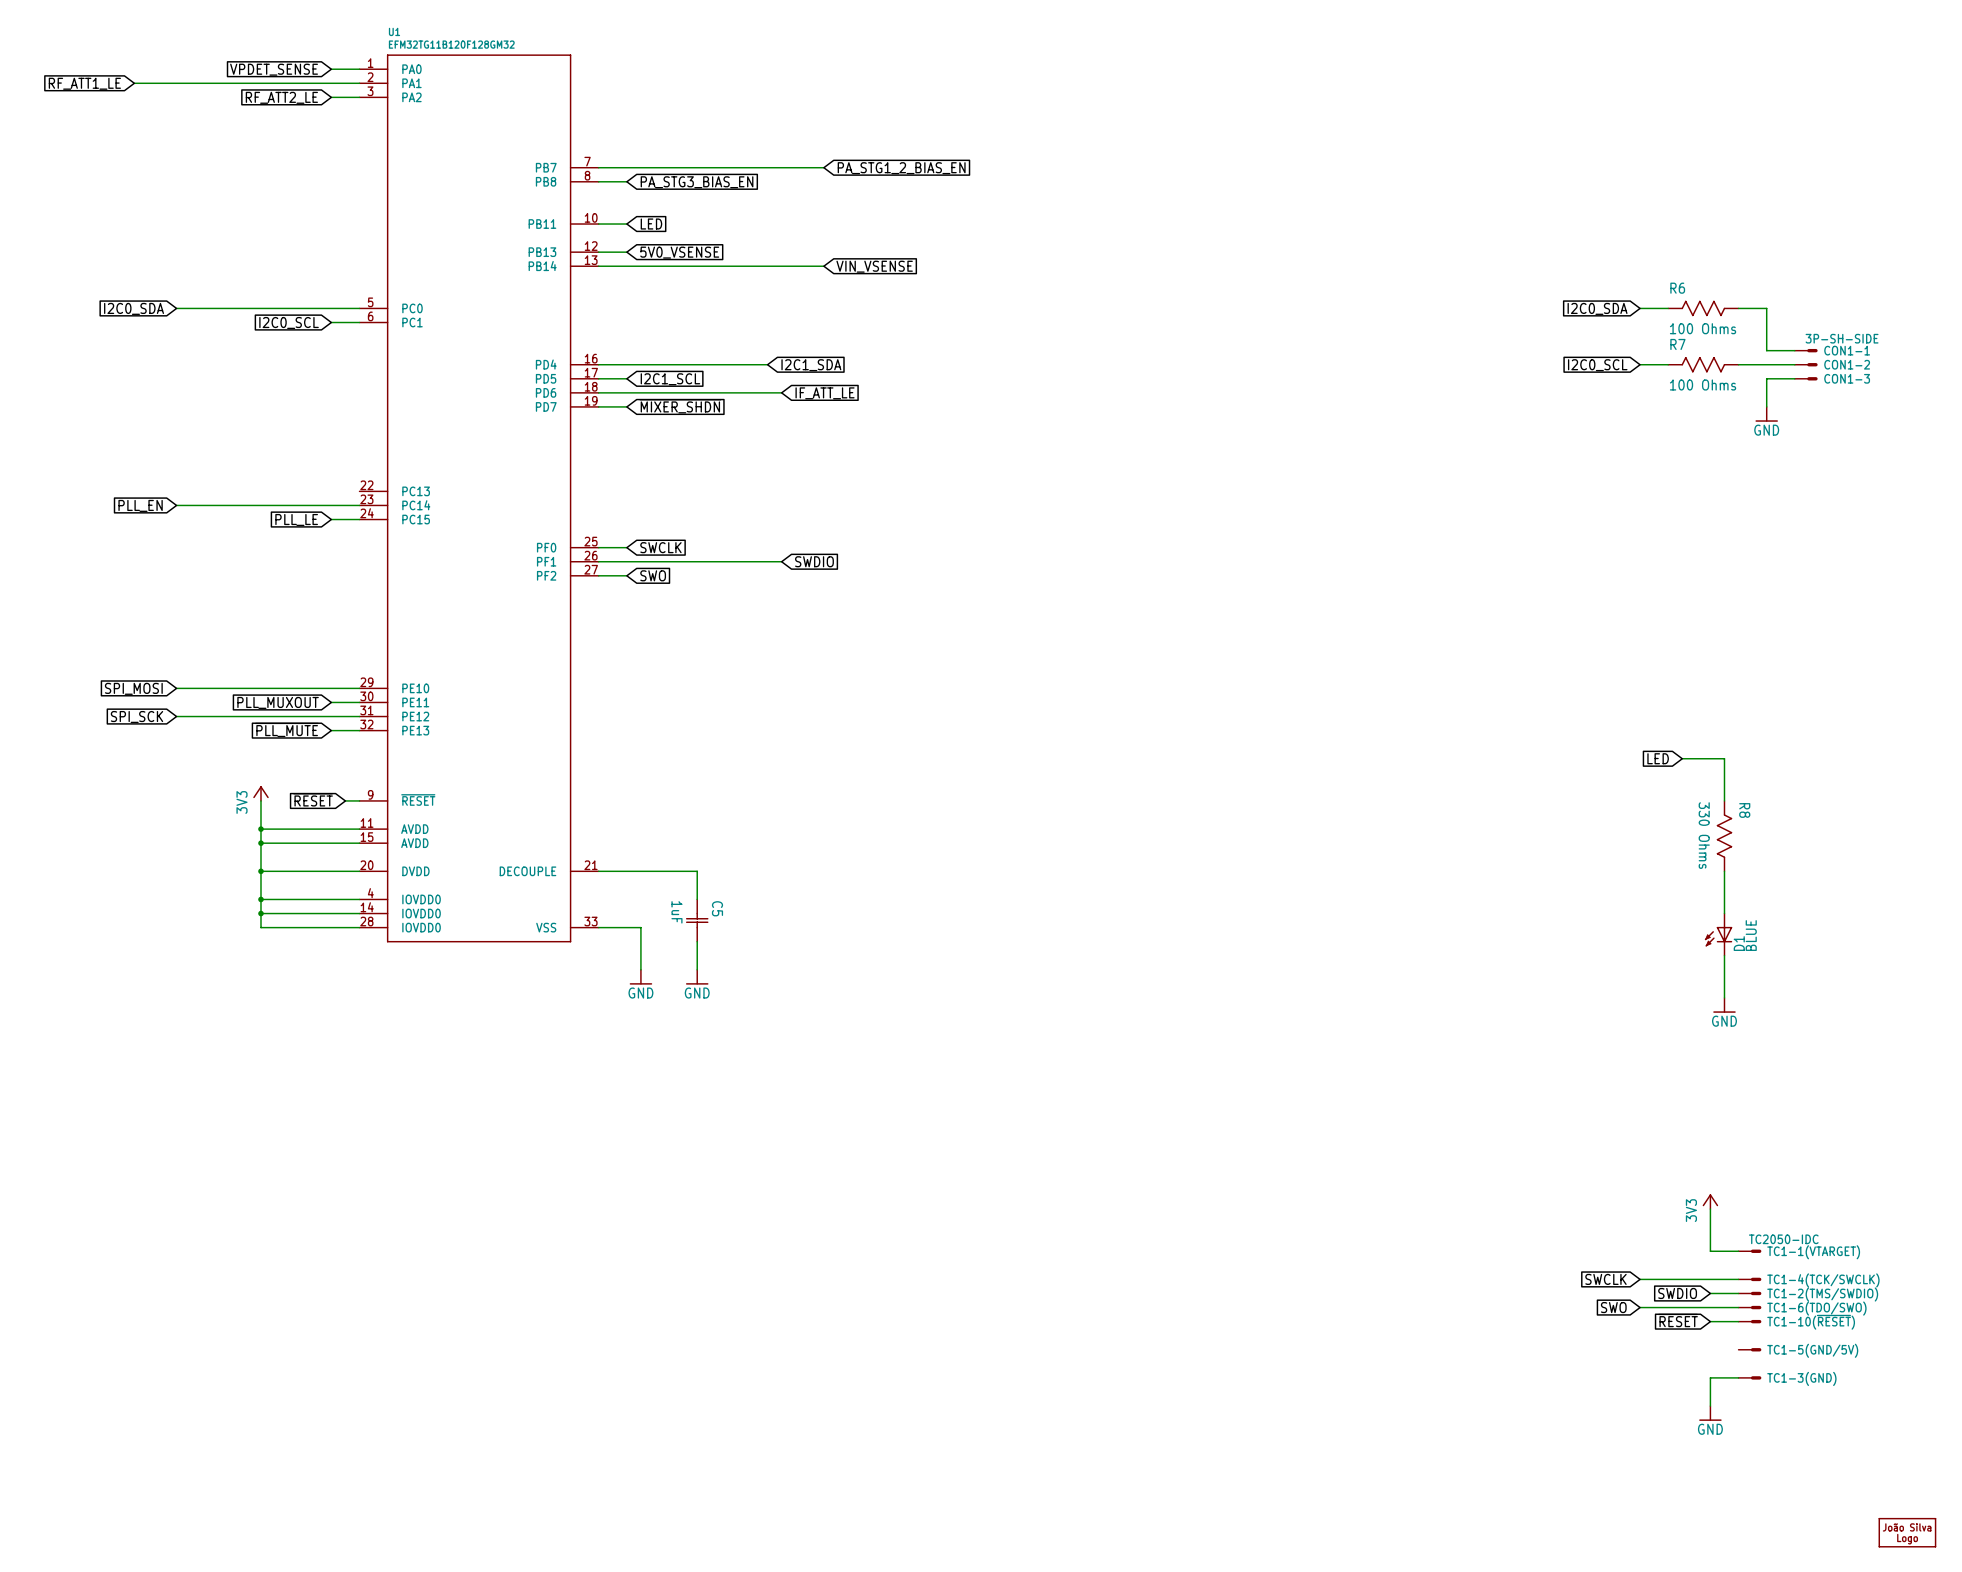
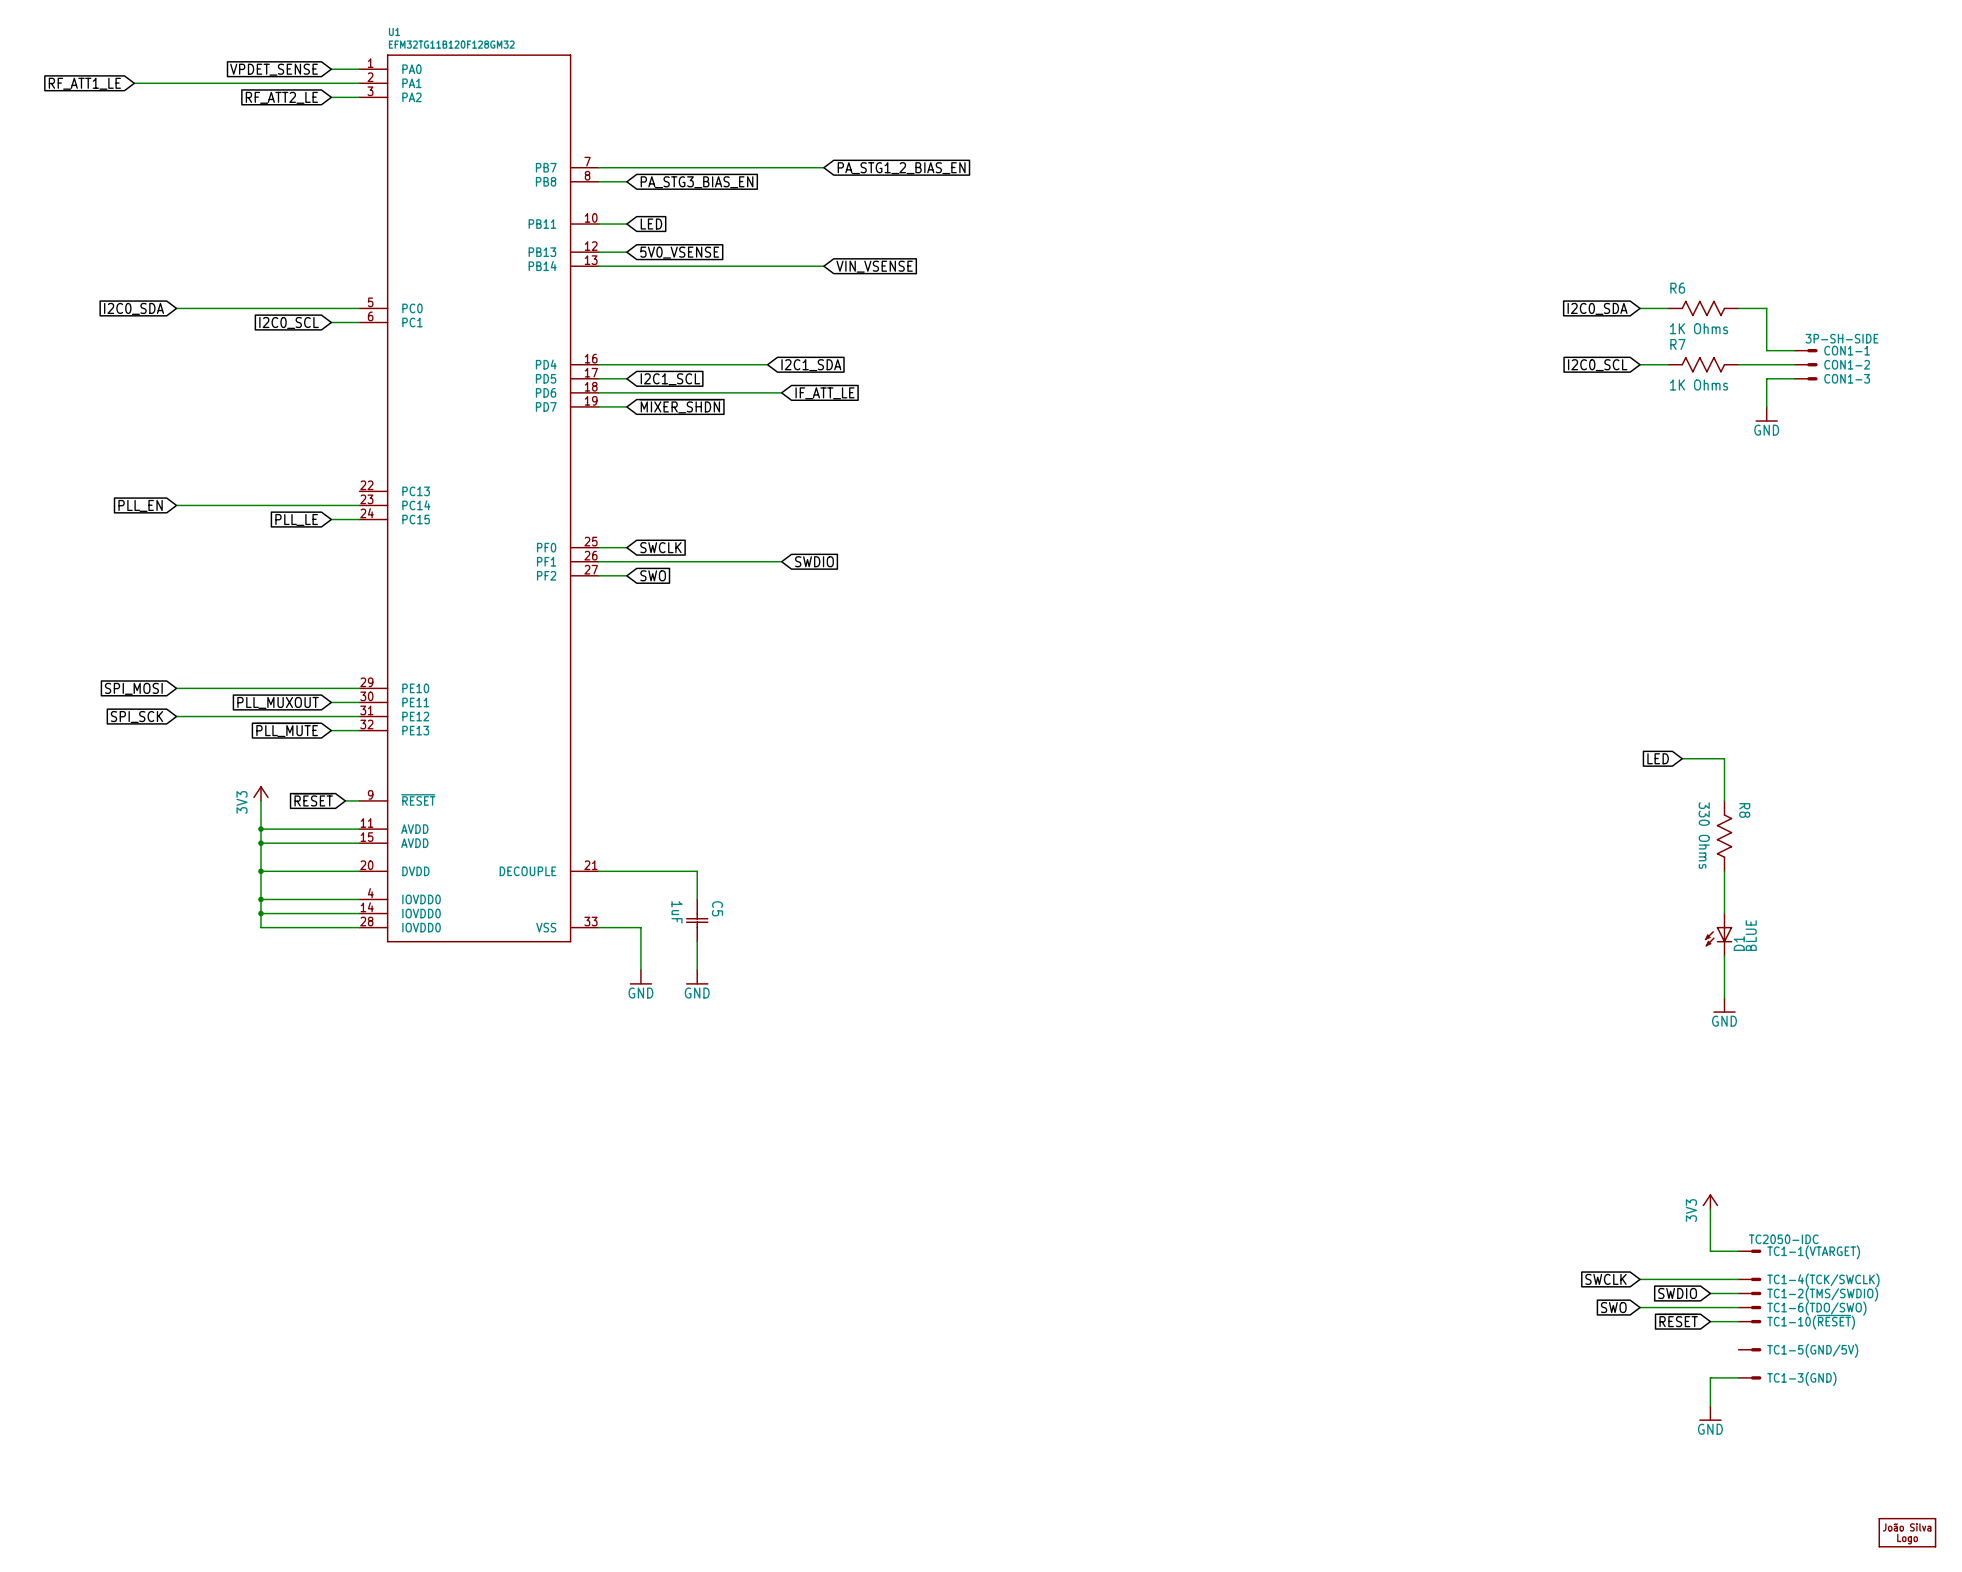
R6 value: 100 Ohms (1703, 328) -> 1K Ohms (1699, 328)
R7 value: 100 Ohms (1703, 384) -> 1K Ohms (1699, 384)

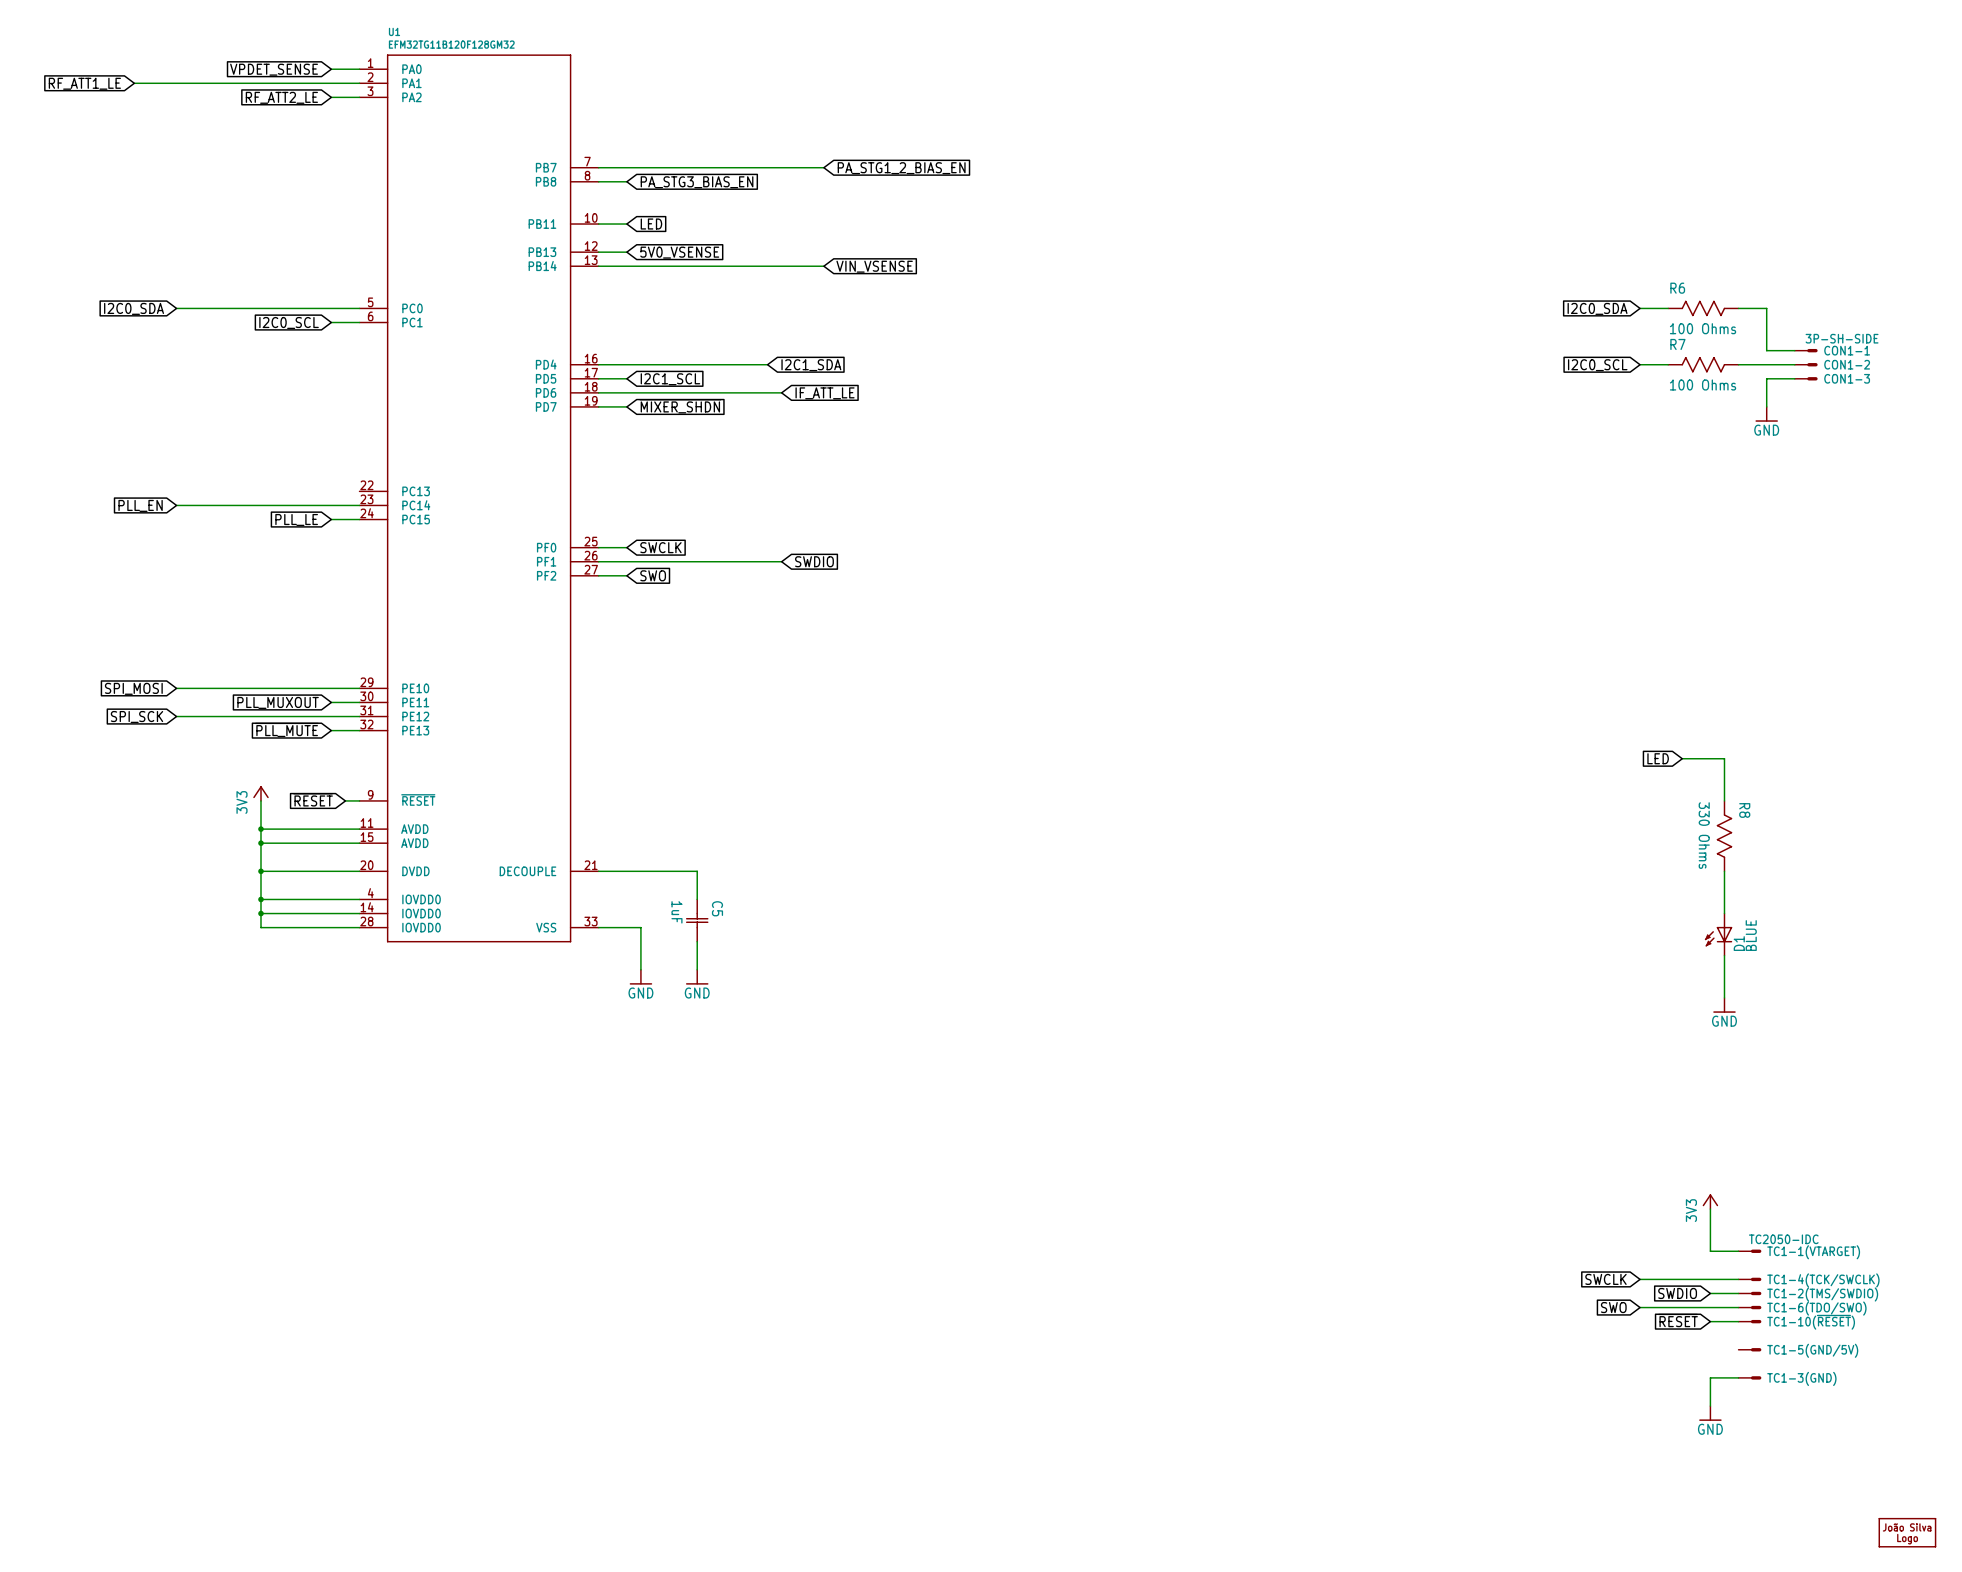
R6 value: 1K Ohms (1699, 328) -> 100 Ohms (1703, 328)
R7 value: 1K Ohms (1699, 384) -> 100 Ohms (1703, 384)

